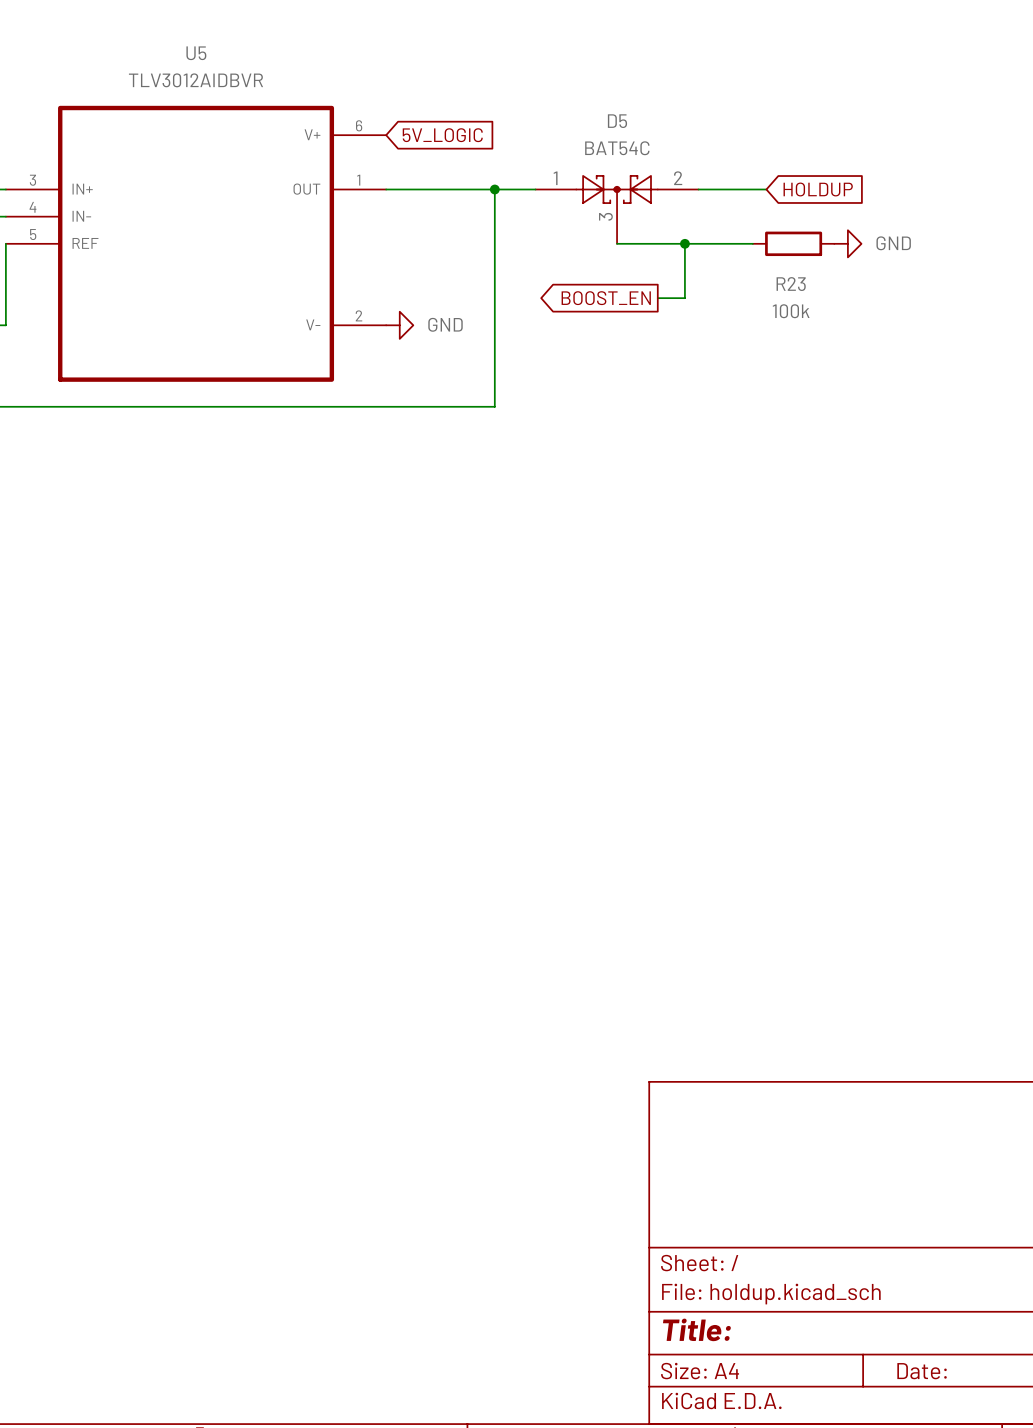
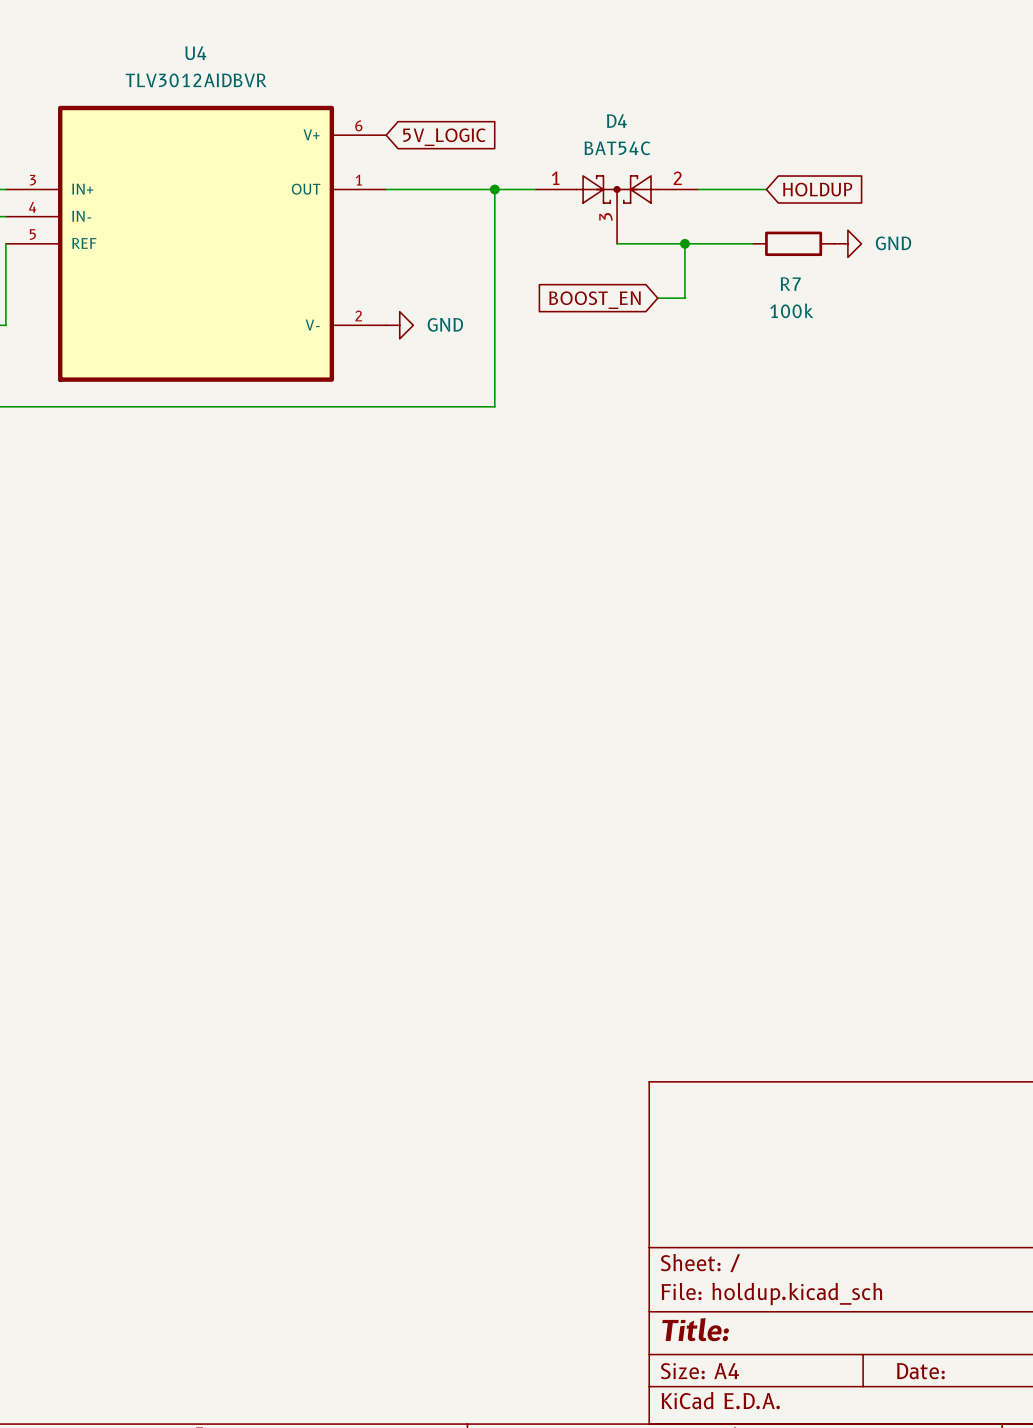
U5 name: U5 (196, 53) -> U4 (195, 53)
D5 name: D5 (617, 121) -> D4 (616, 121)
R23 name: R23 (791, 284) -> R7 (790, 284)
global label shape: output (606, 298) -> input (594, 300)

